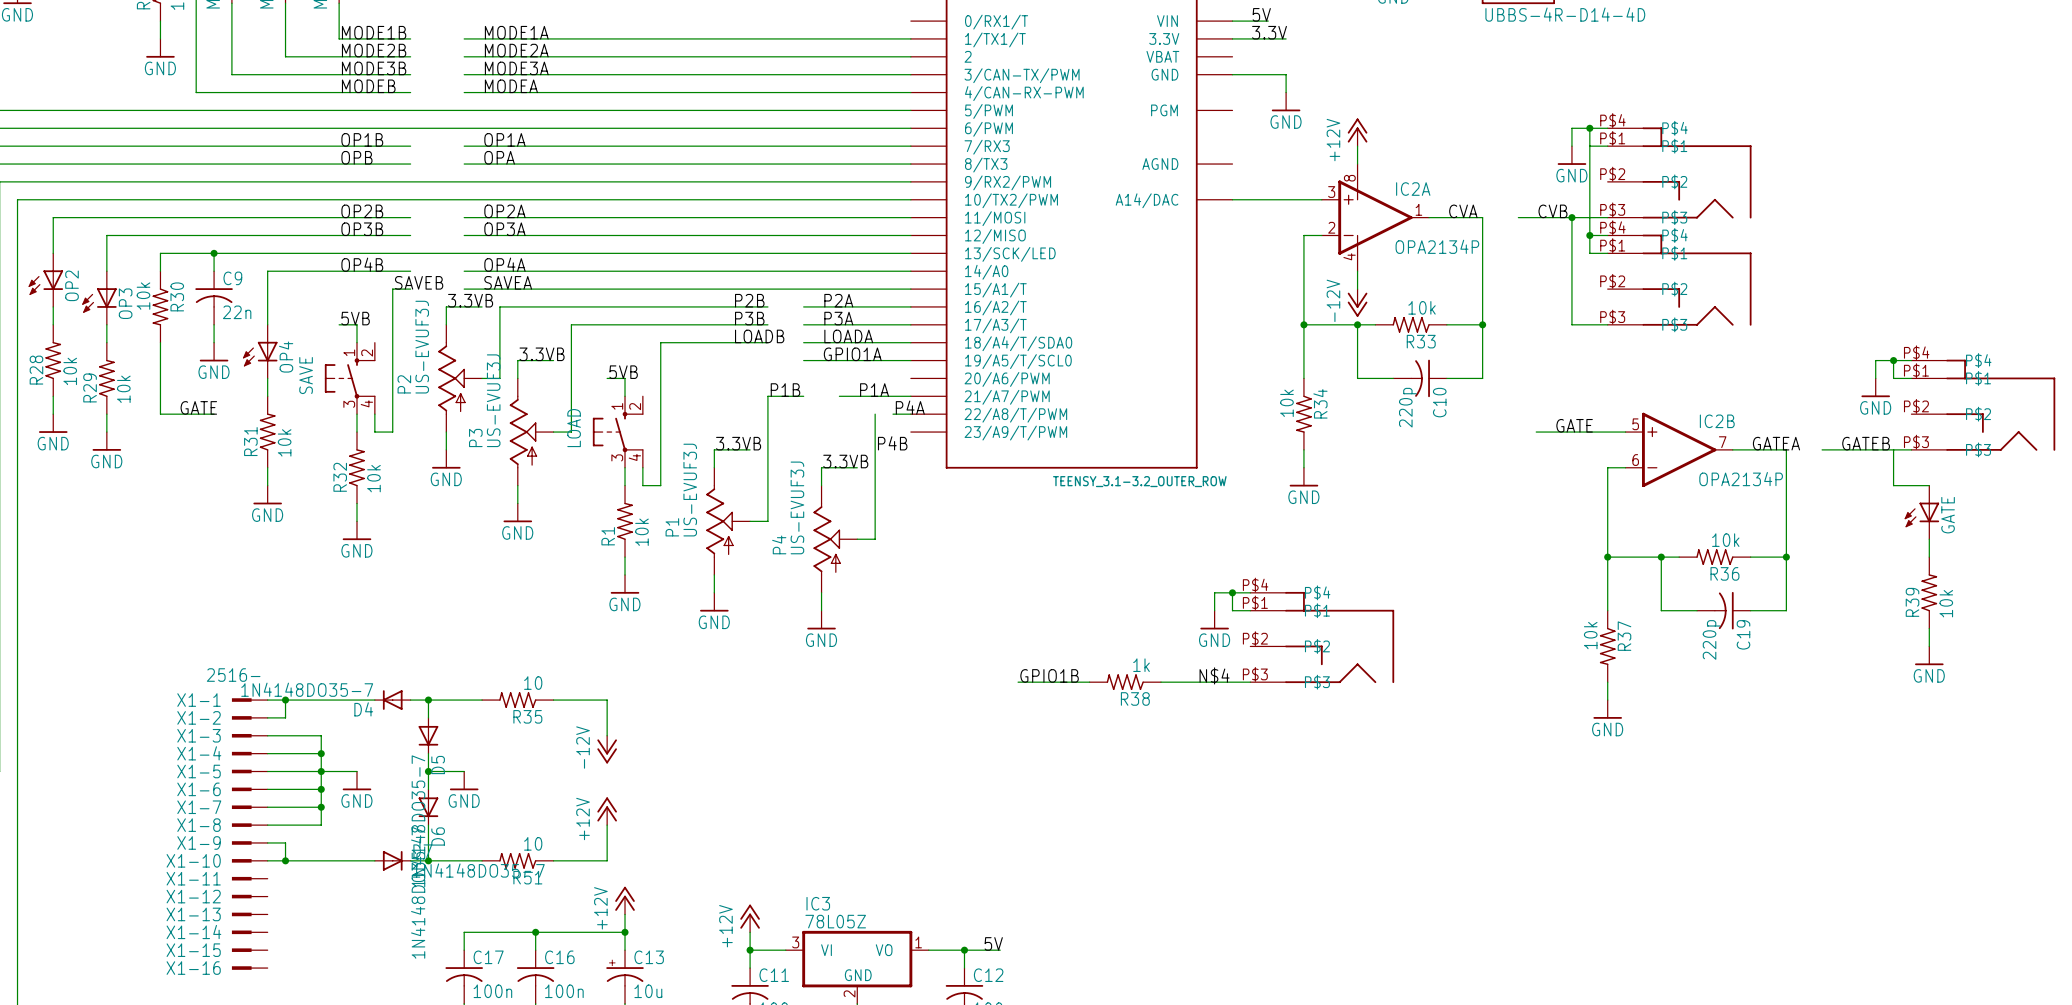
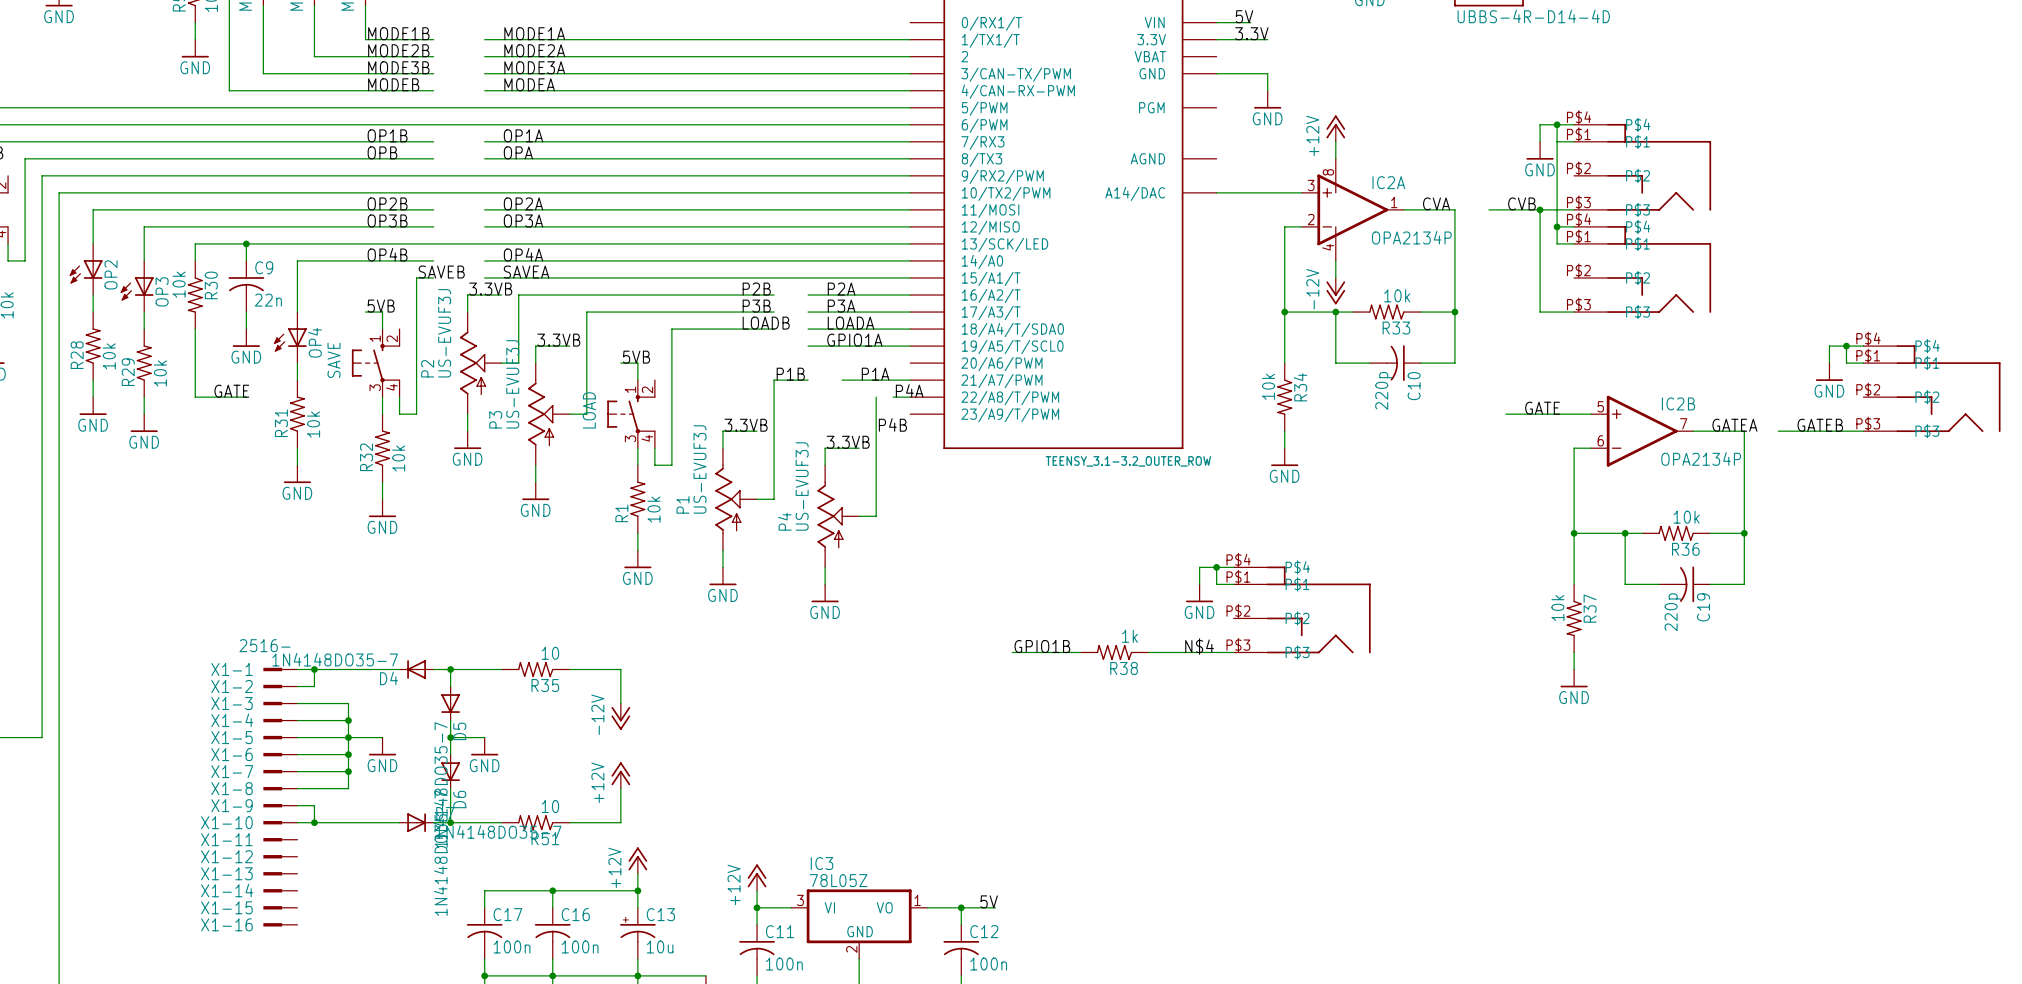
wire: (1893, 449) (1893, 485) (1929, 485) -> none
GATE: (1921, 512) -> none
wire: (1929, 539) (1929, 557) -> none
R39: 10k (1929, 592) -> none
wire: (1929, 628) (1929, 646) -> none
power symbol: GND (1929, 655) -> none

